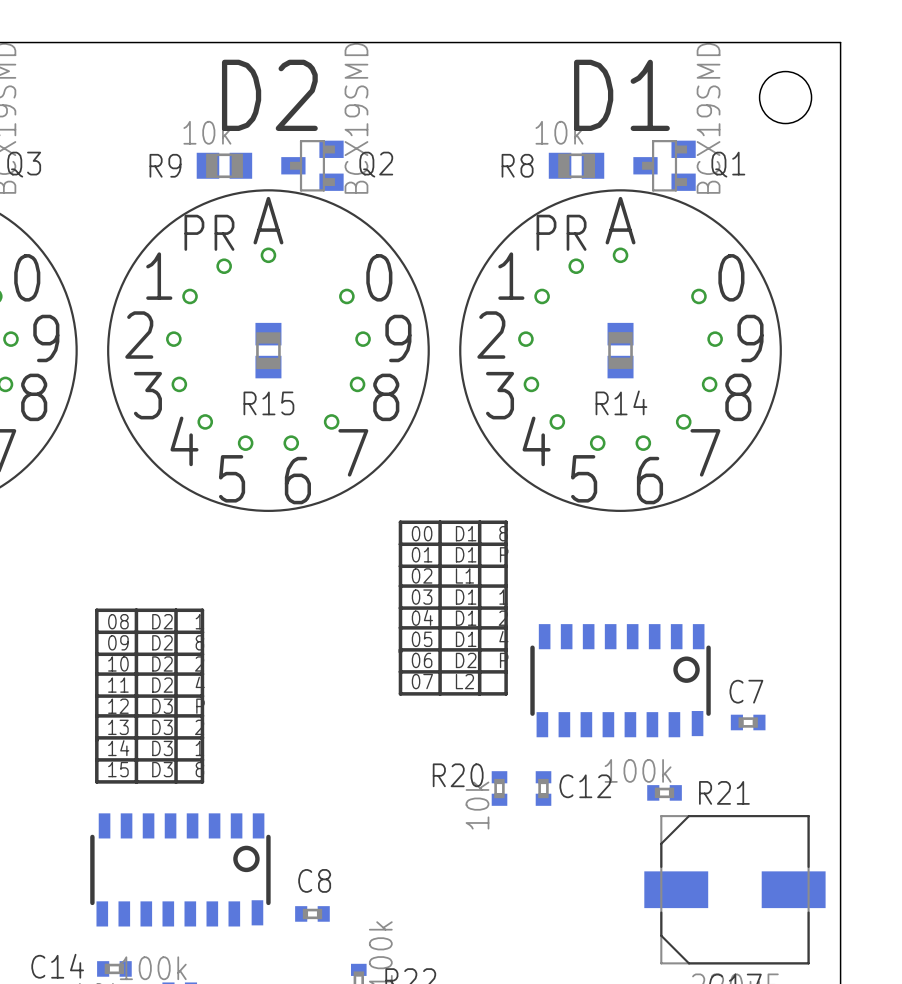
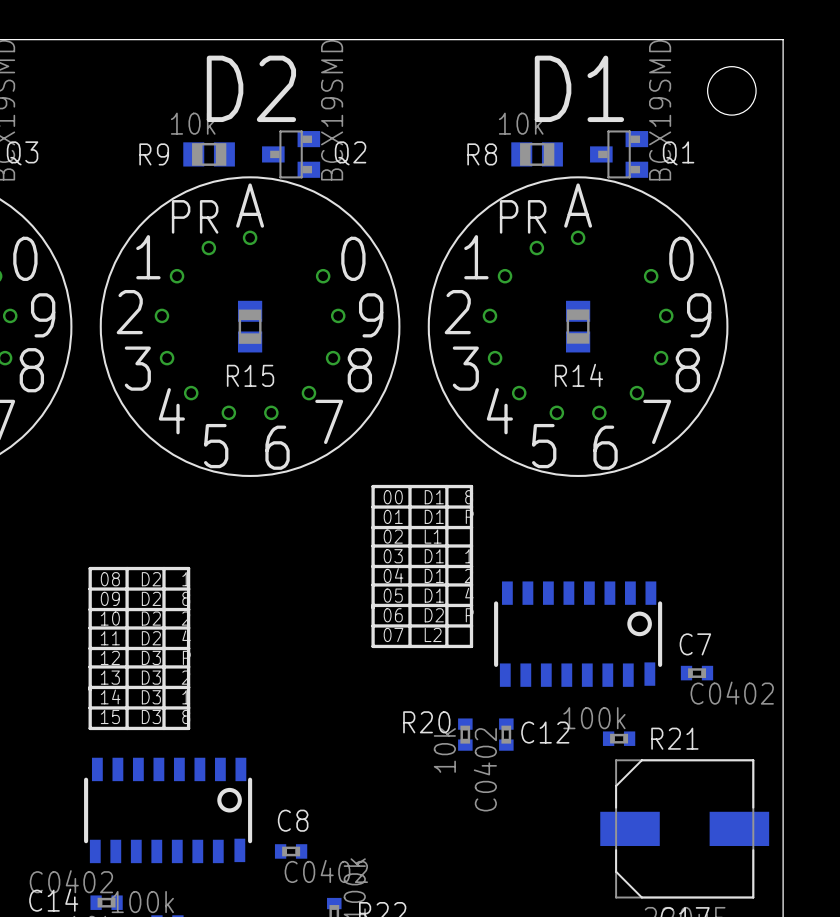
C7 value: none -> C0402 (732, 693)
C12 value: none -> C0402 (485, 769)
C8 value: none -> C0402 (326, 871)
C14 value: none -> C0402 (71, 881)

